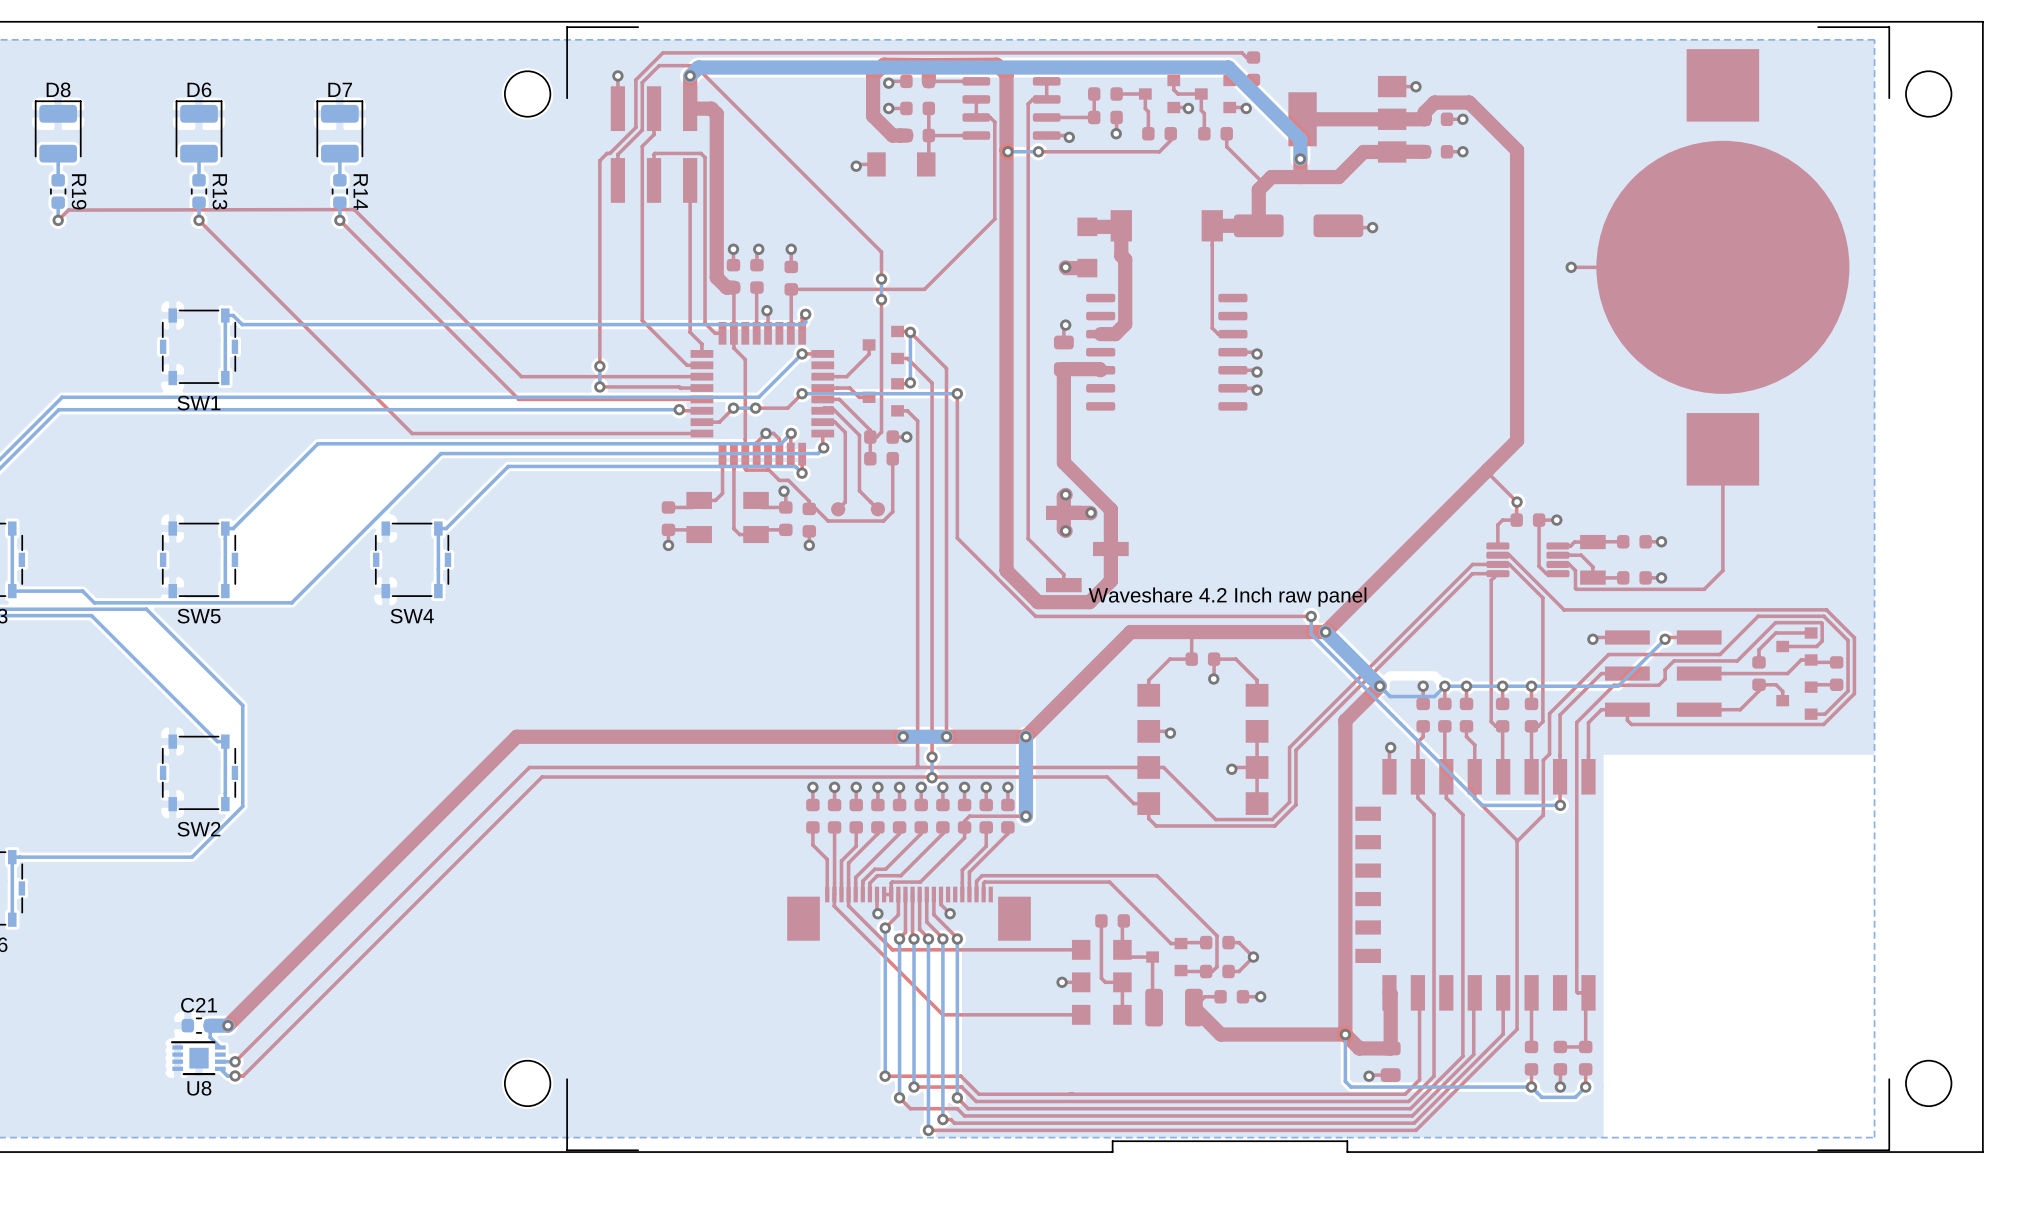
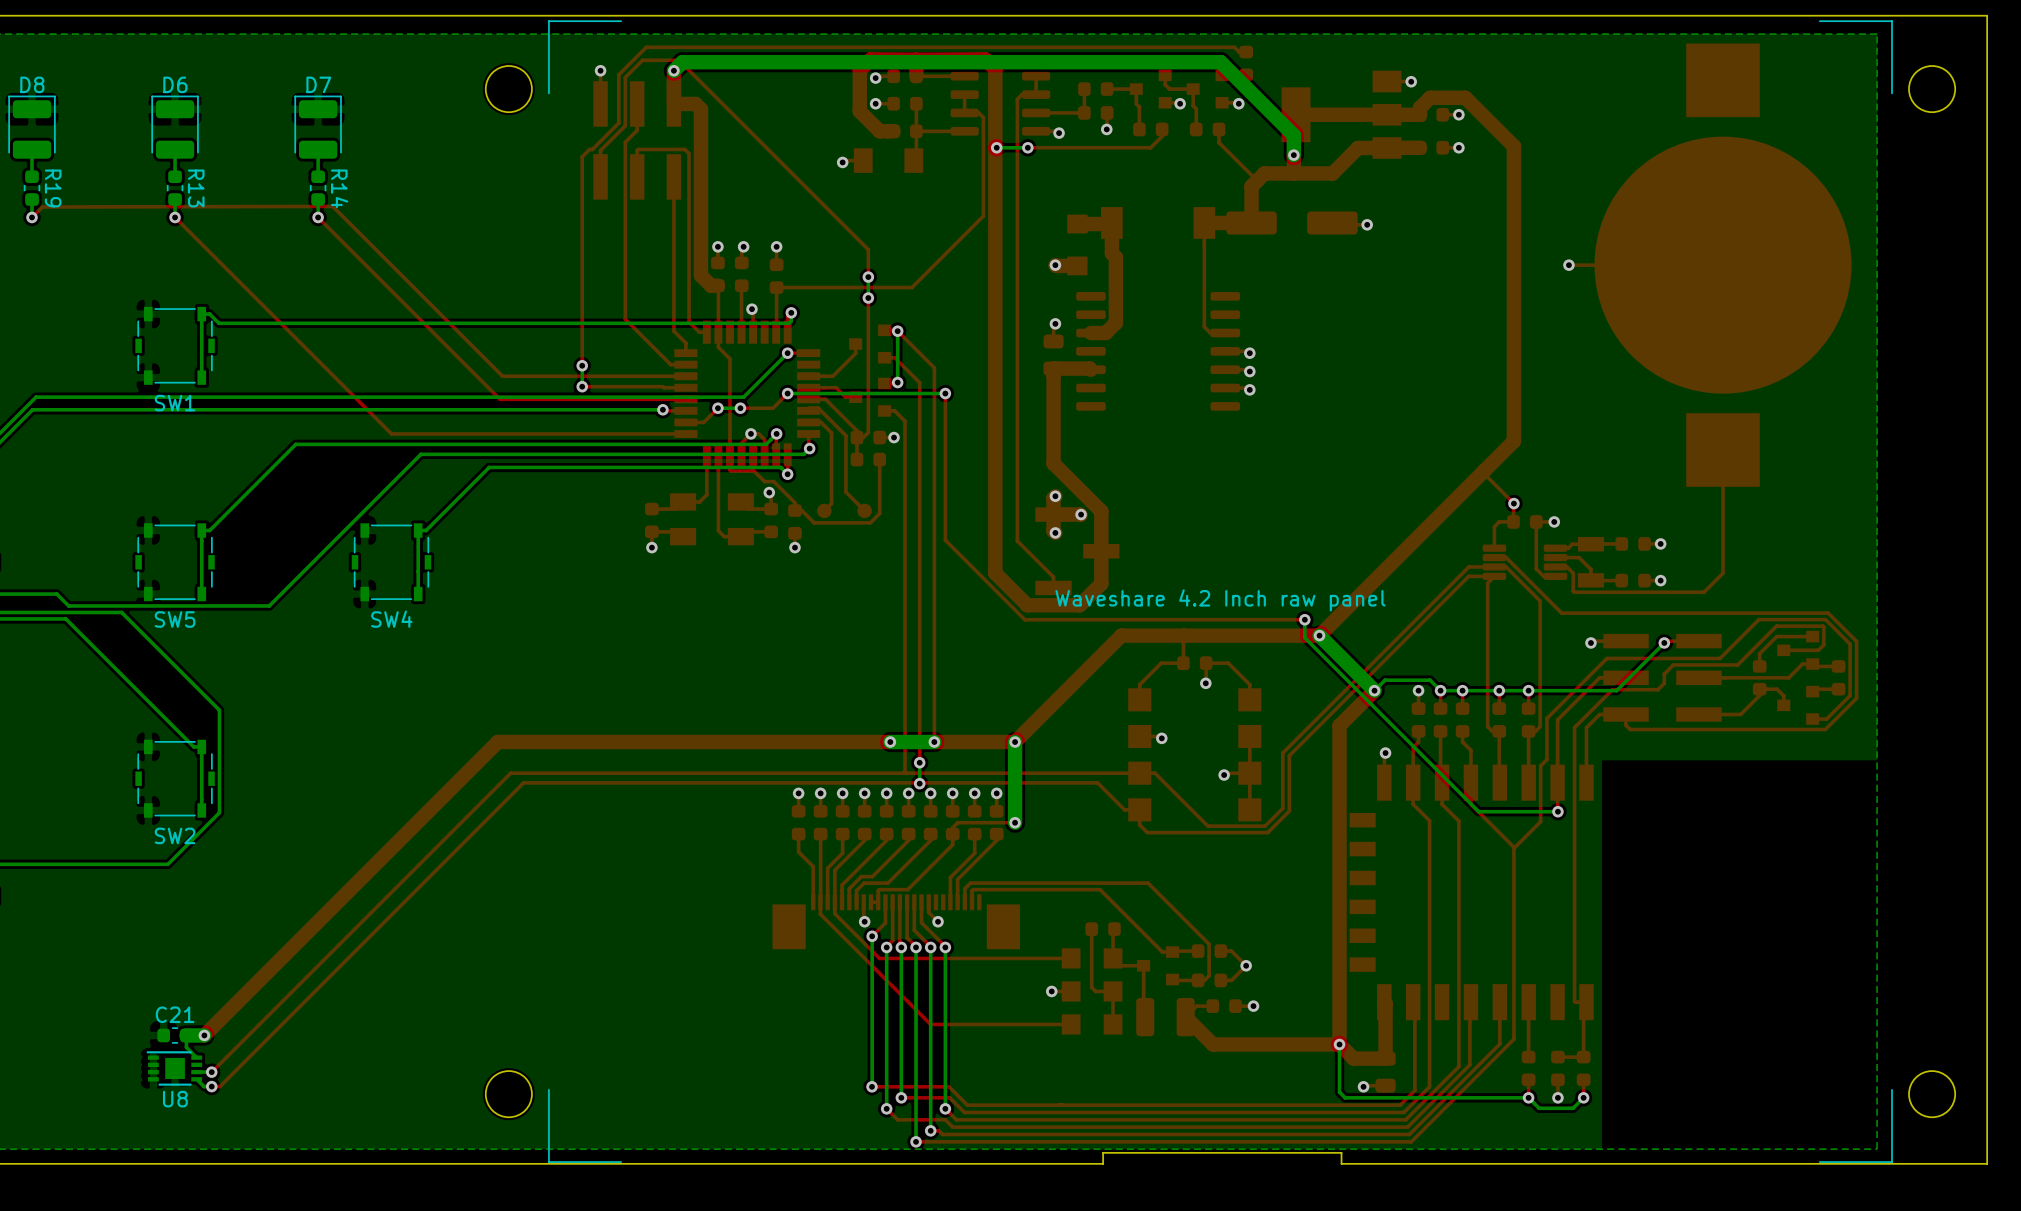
bottom track: (1444, 686) (1434, 696) (1390, 696) (1379, 686) -> (1440, 690) (1430, 680) (1385, 680) (1374, 690)

